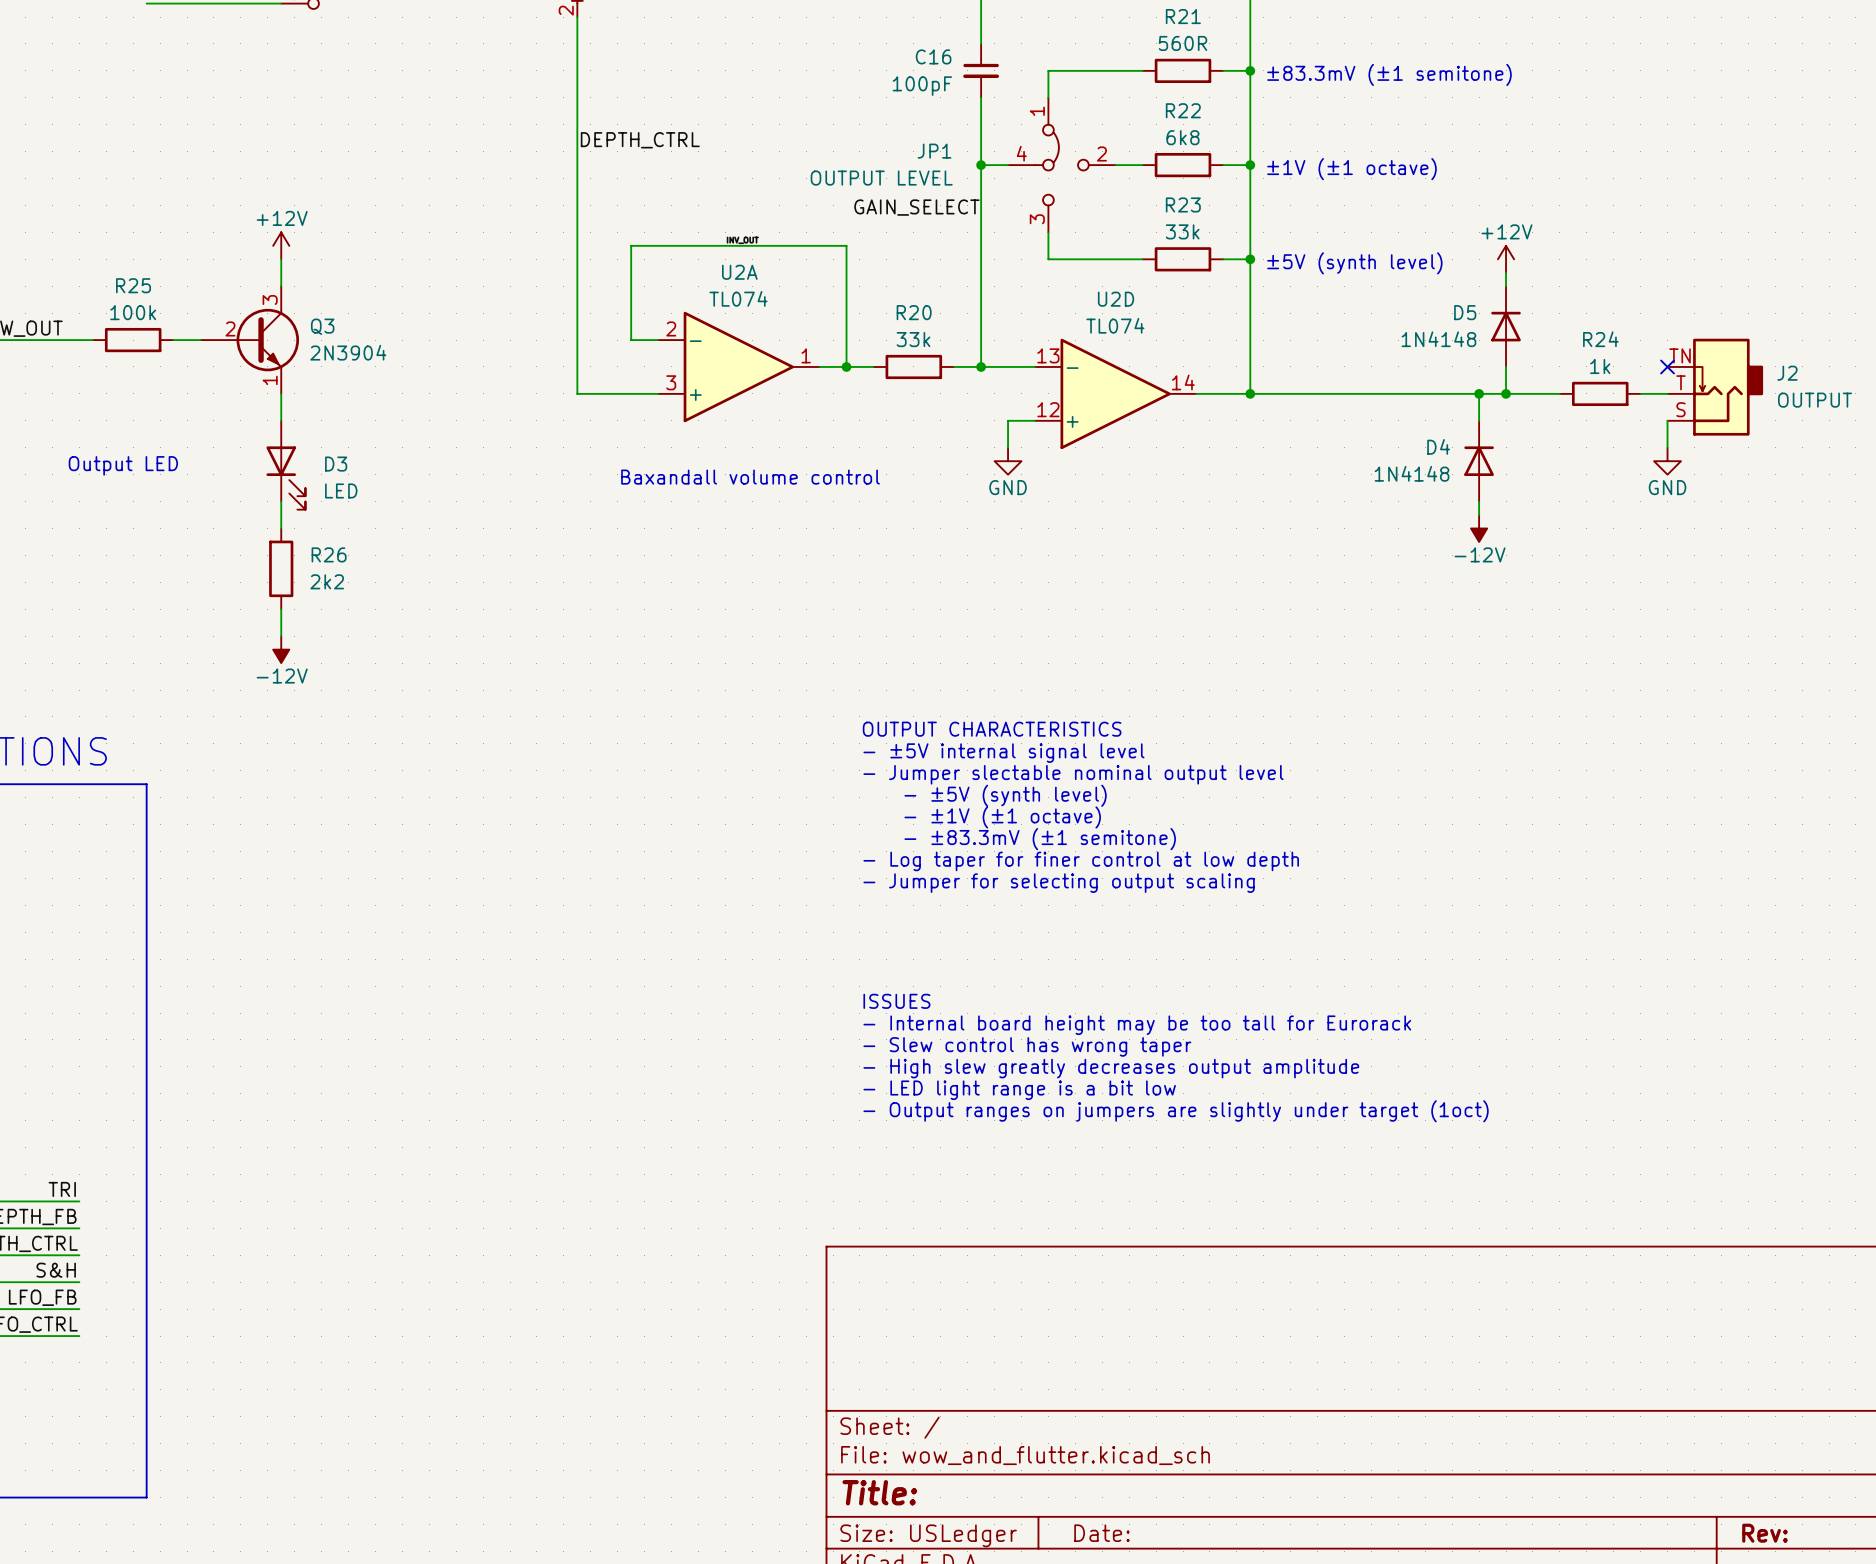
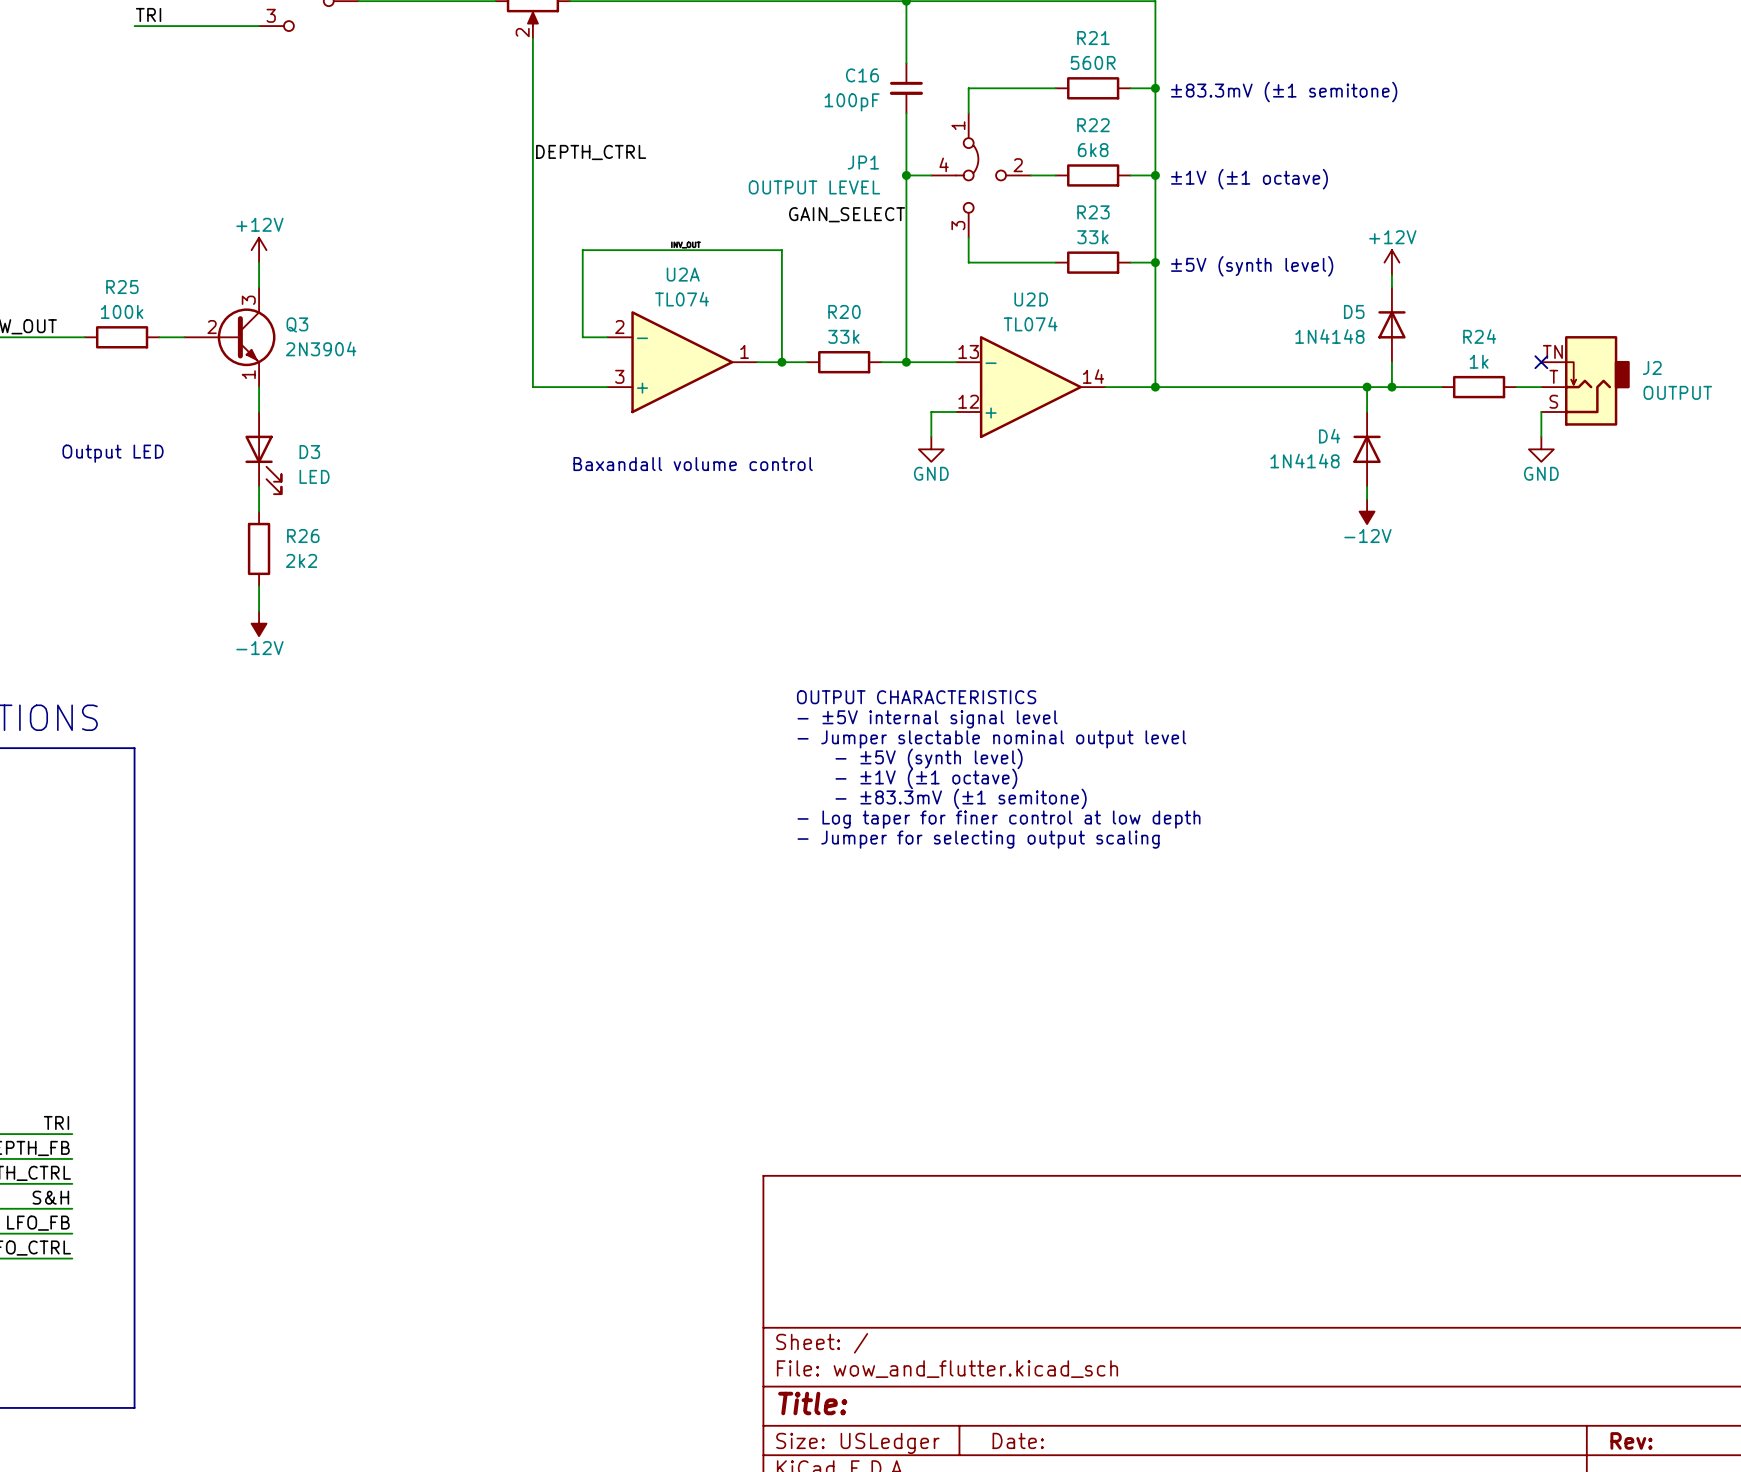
text: ISSUES (896, 1001) -> none
text: - Internal board height may be too tall for Eurorack (1137, 1025) -> none
text: - Slew control has wrong taper (1027, 1046) -> none
text: - High slew greatly decreases output amplitude (1111, 1068) -> none
text: - LED light range is a bit low (1019, 1090) -> none
text: - Output ranges on jumpers are slightly under target (1oct) (1176, 1111) -> none

